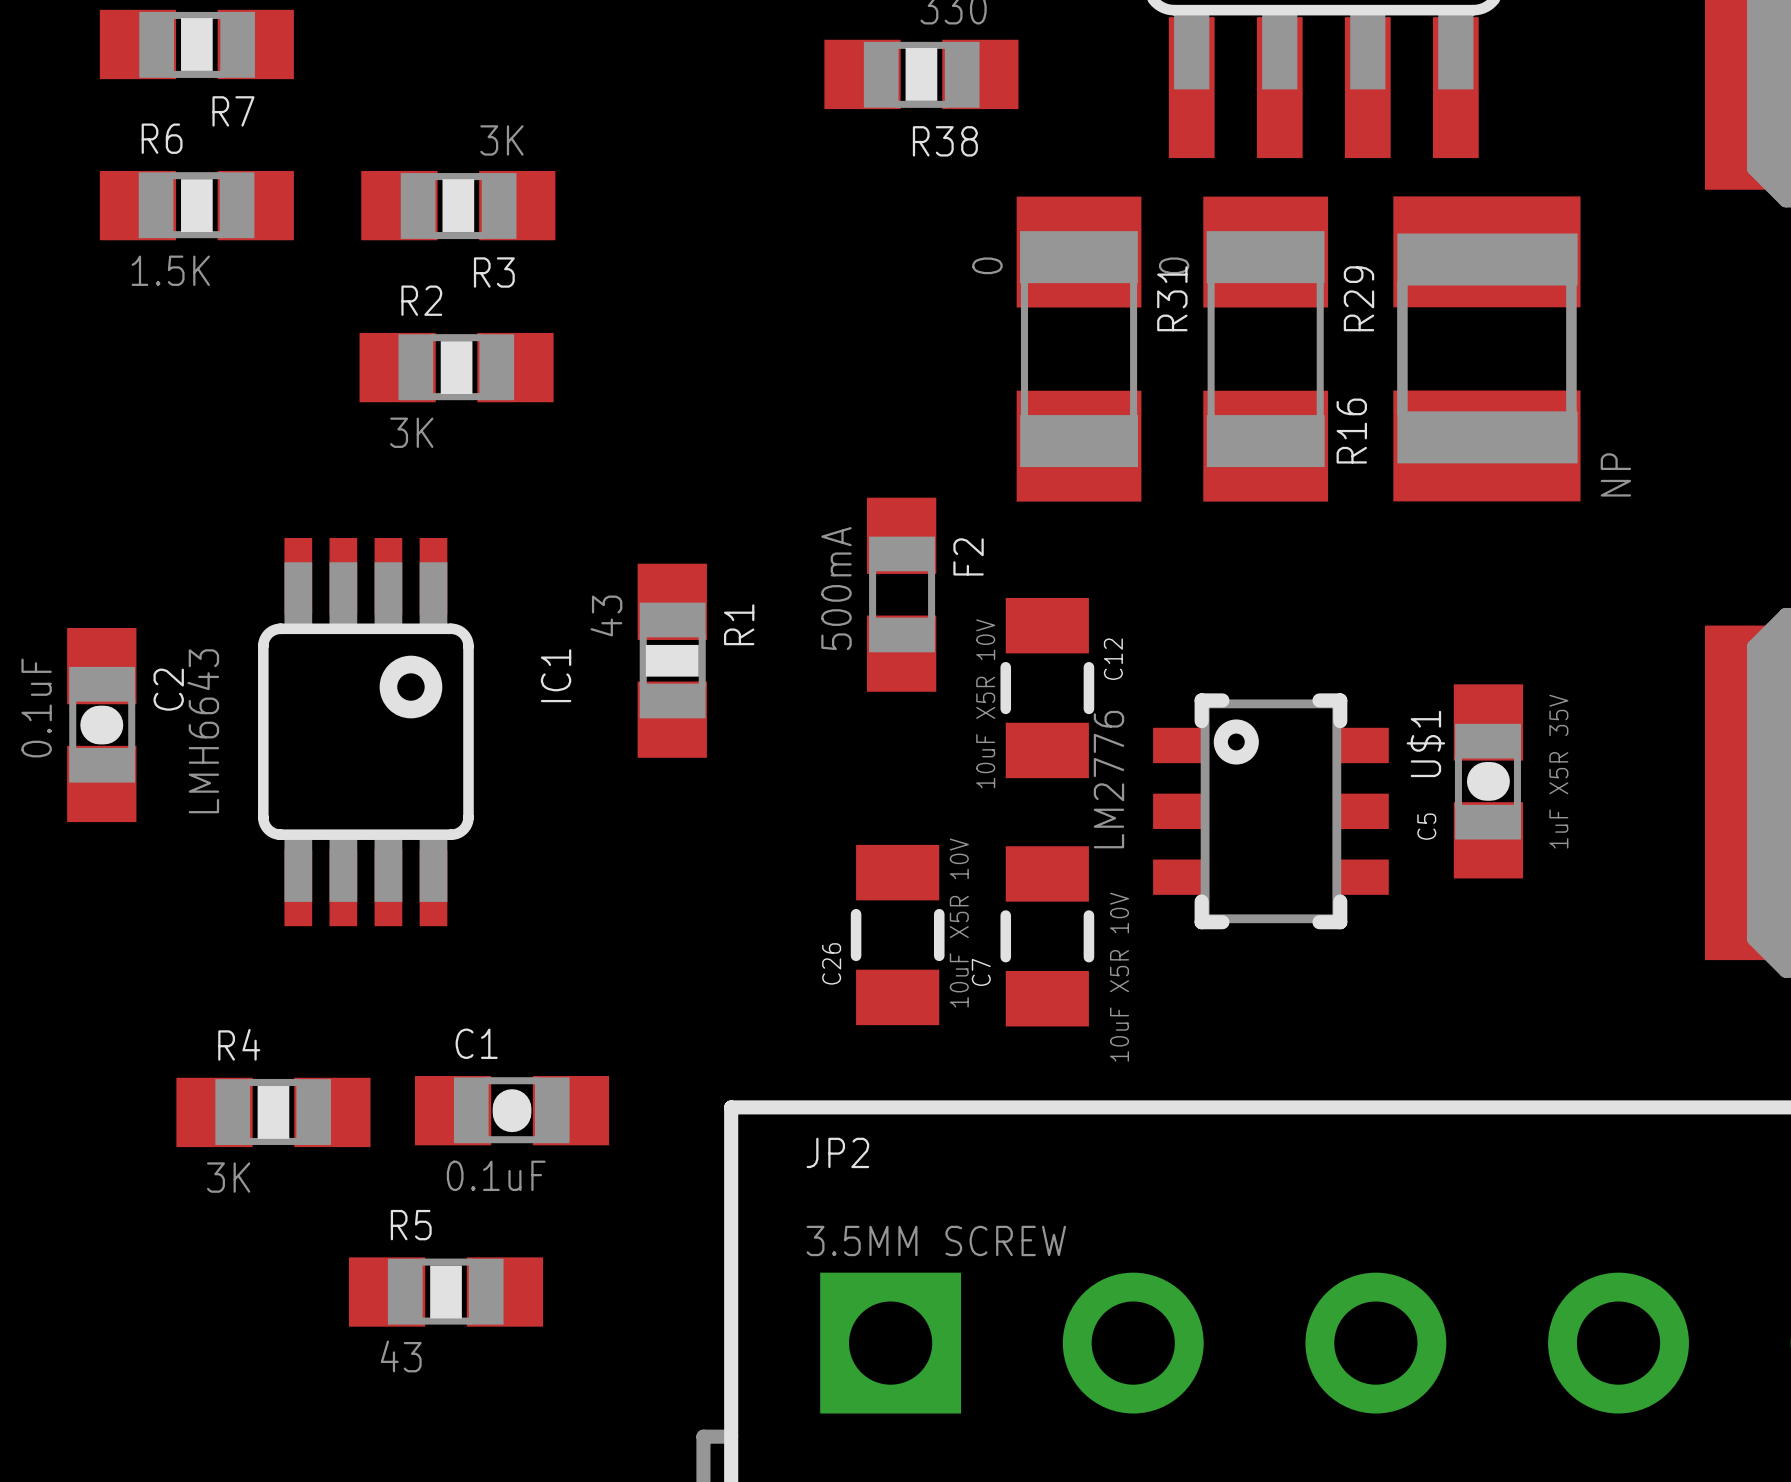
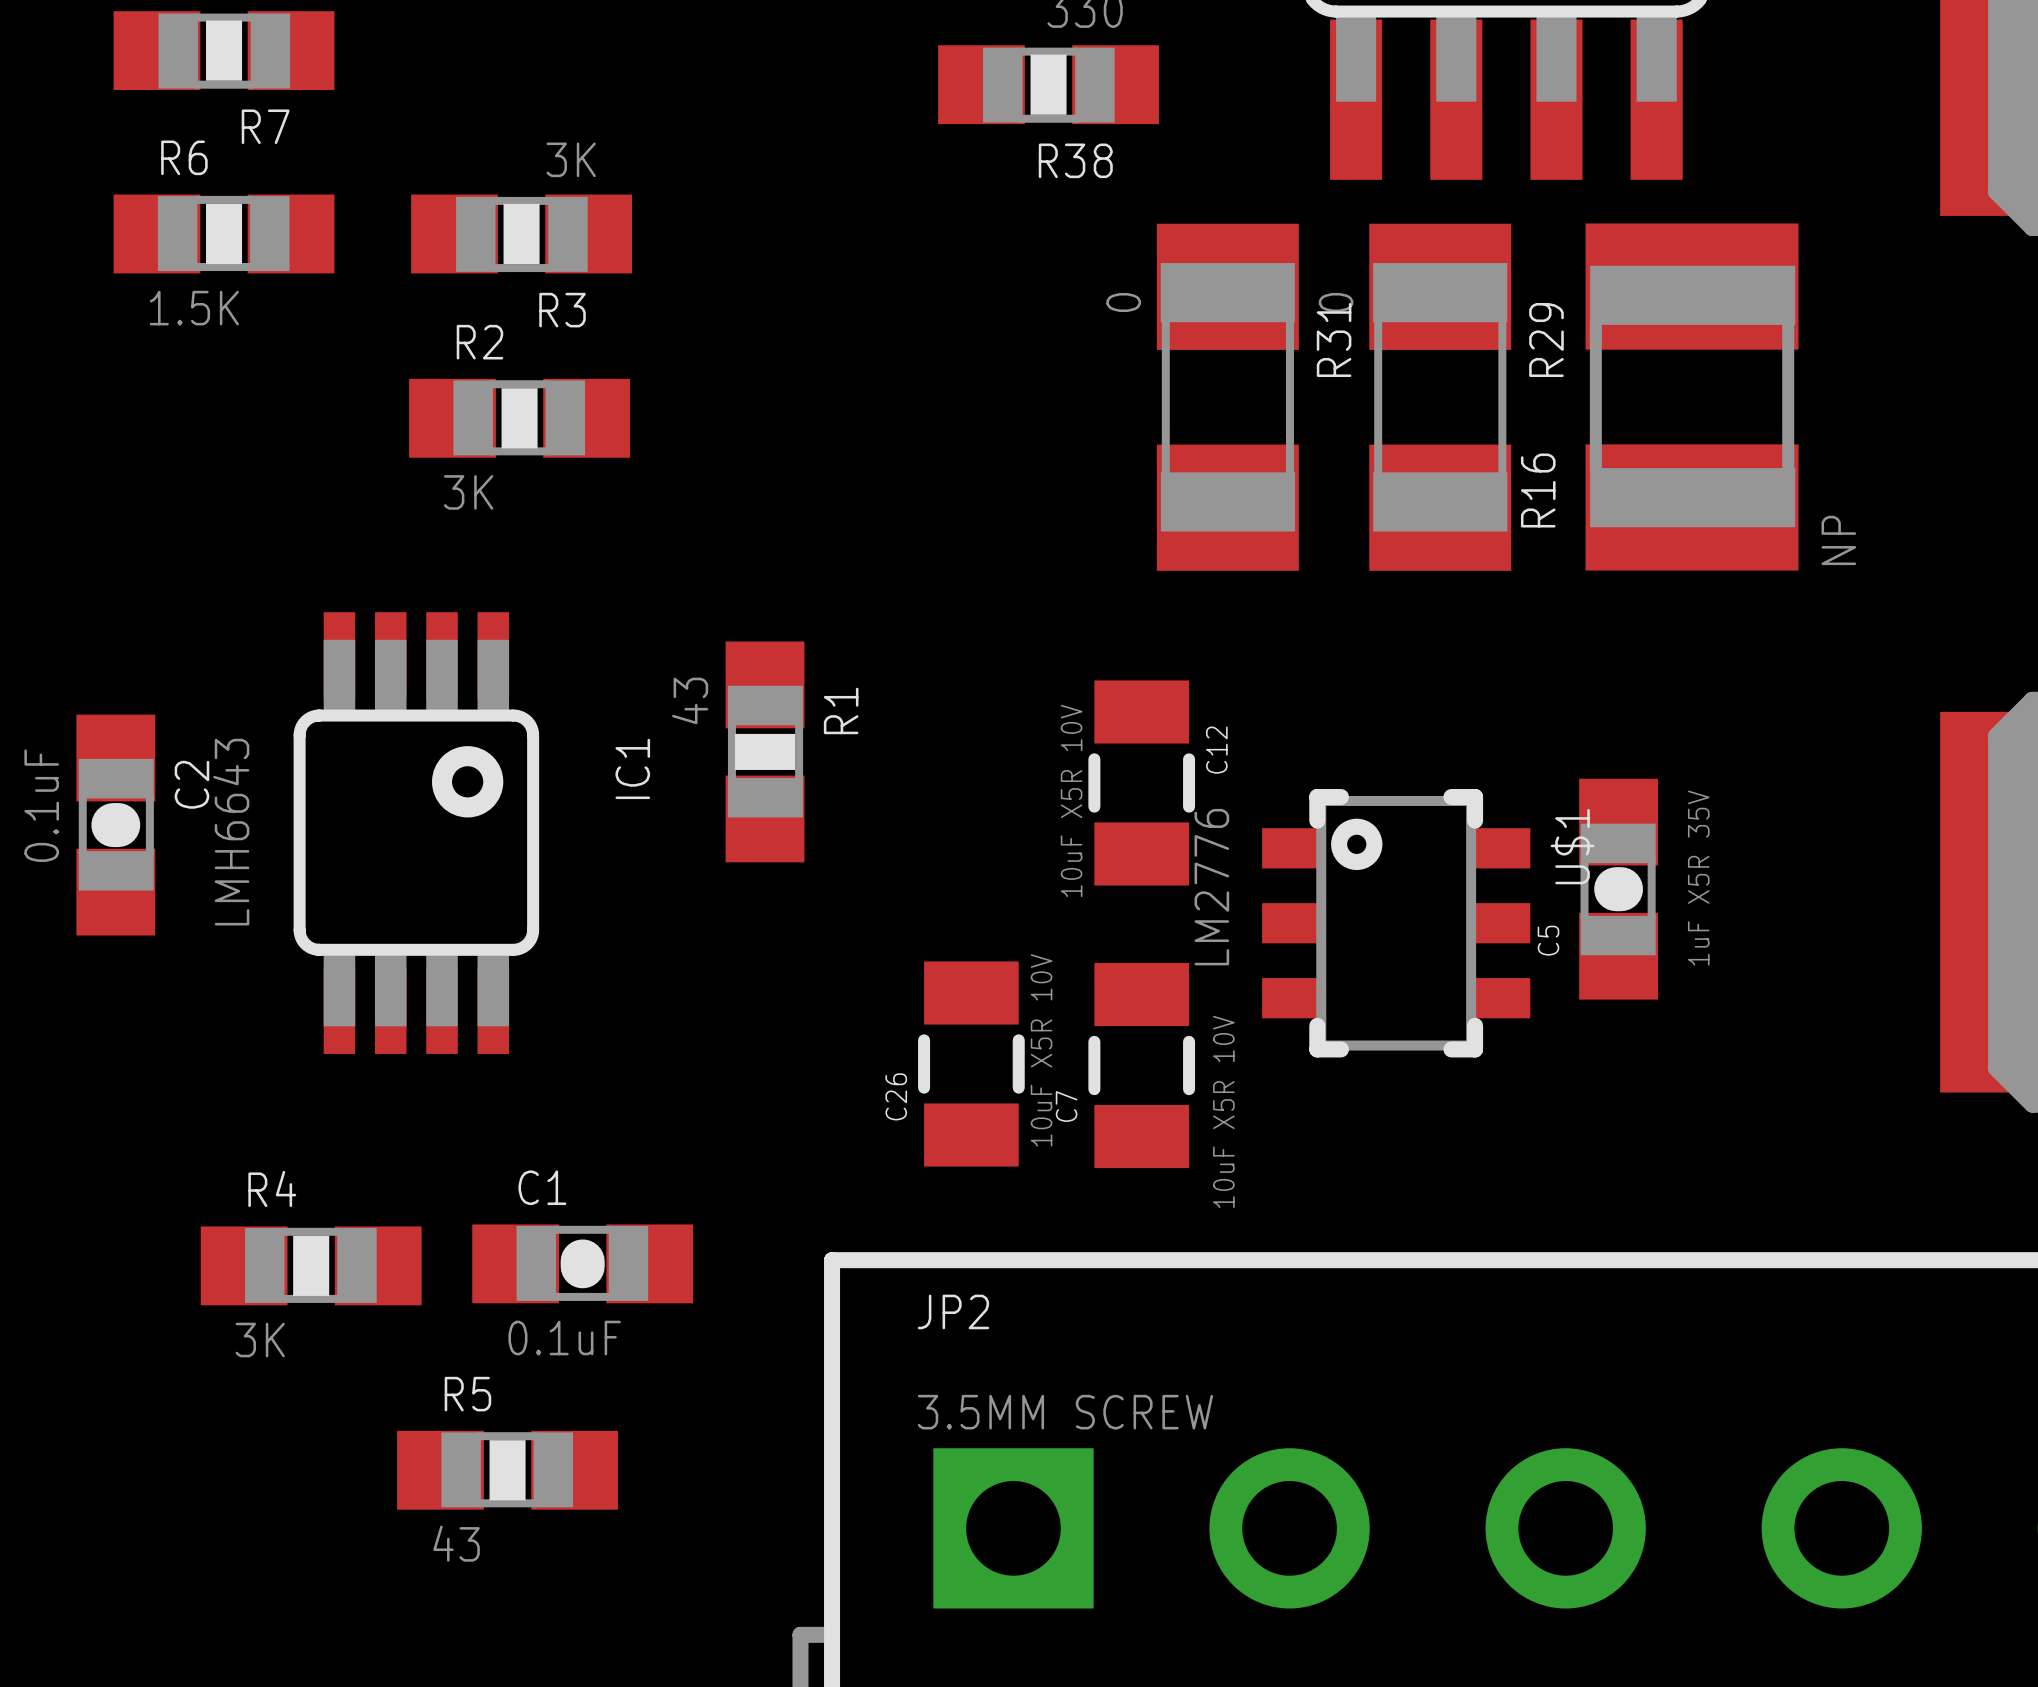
F2: 500mA (901, 594) -> none
C12 position: (1047, 688) -> (1141, 782)
C5 position: (1488, 781) -> (1618, 889)
U$1 position: (1270, 811) -> (1396, 923)
C26 position: (897, 935) -> (971, 1064)
C7 position: (1047, 936) -> (1141, 1065)

